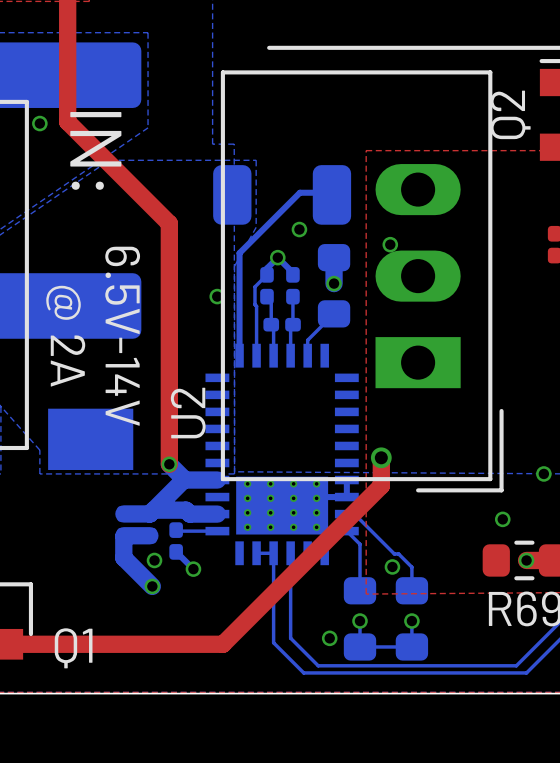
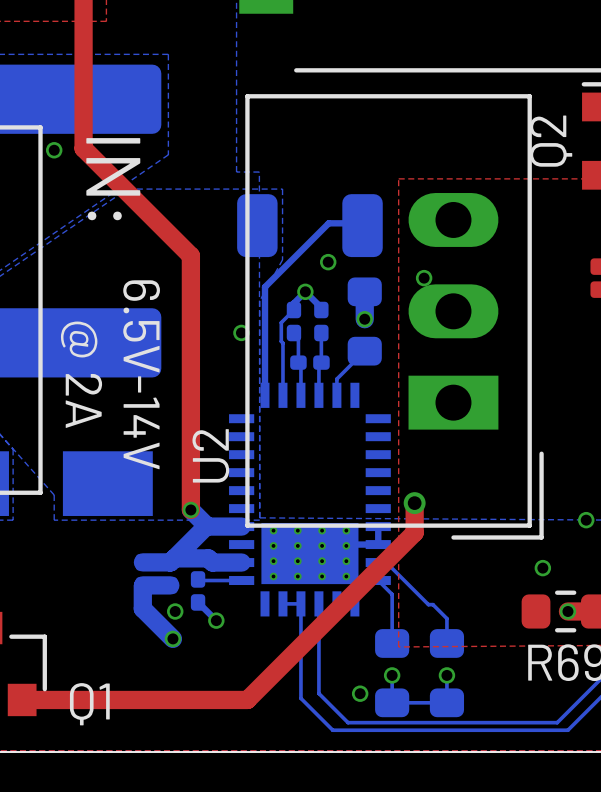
via: (392, 566) -> none

